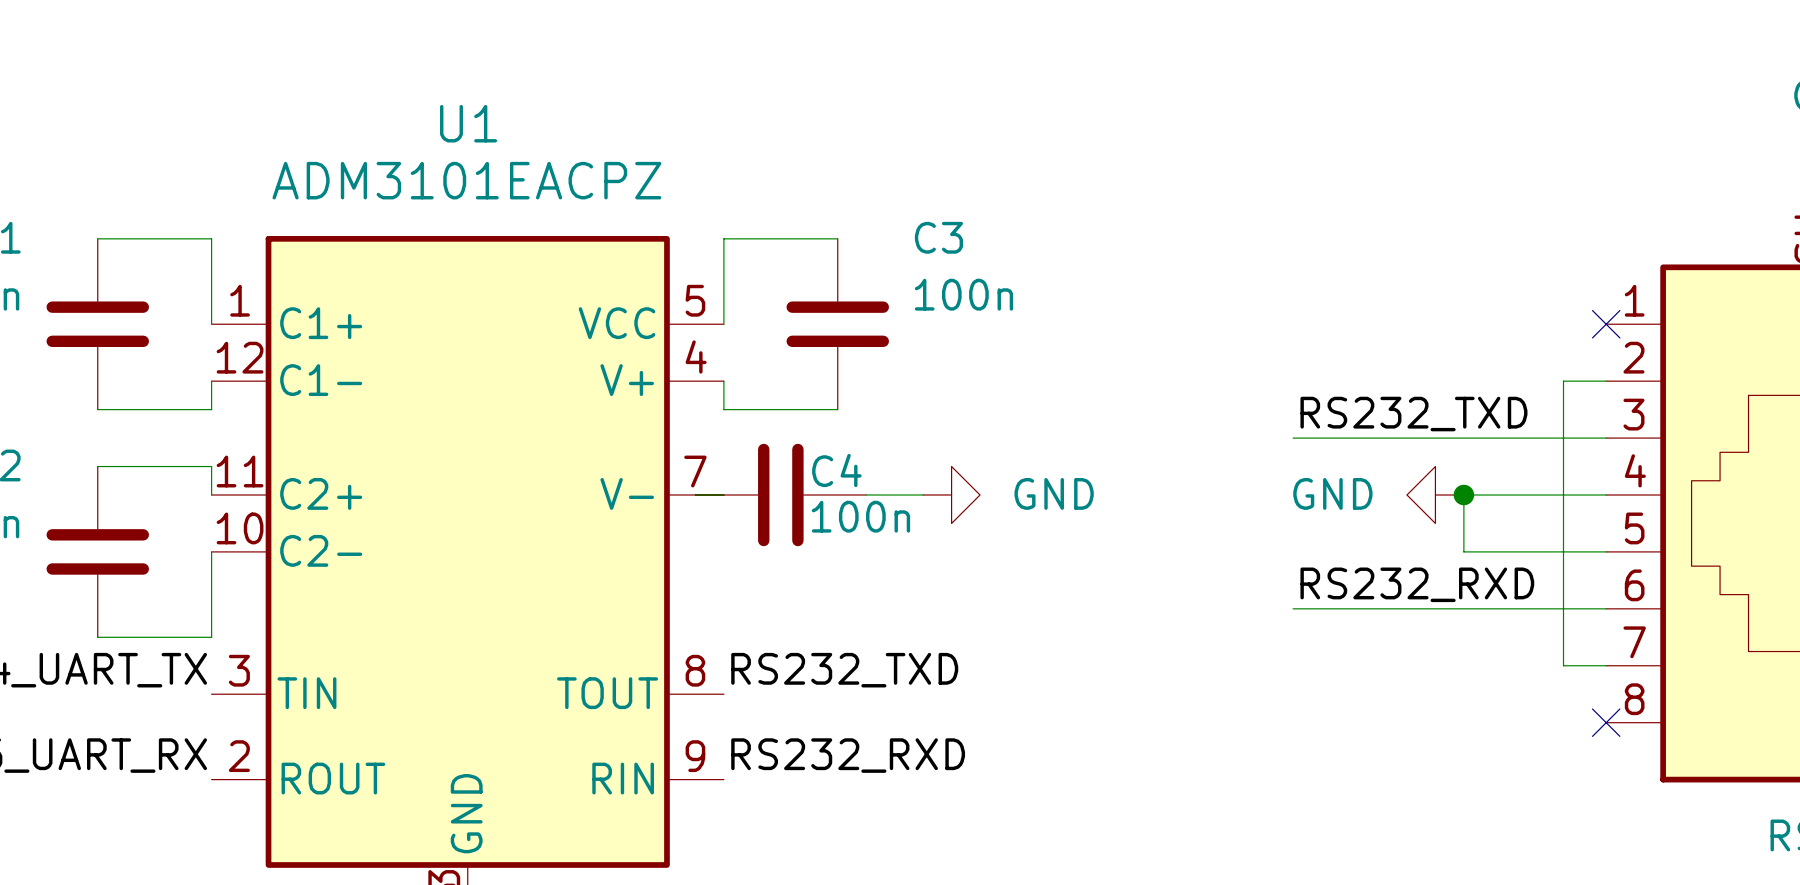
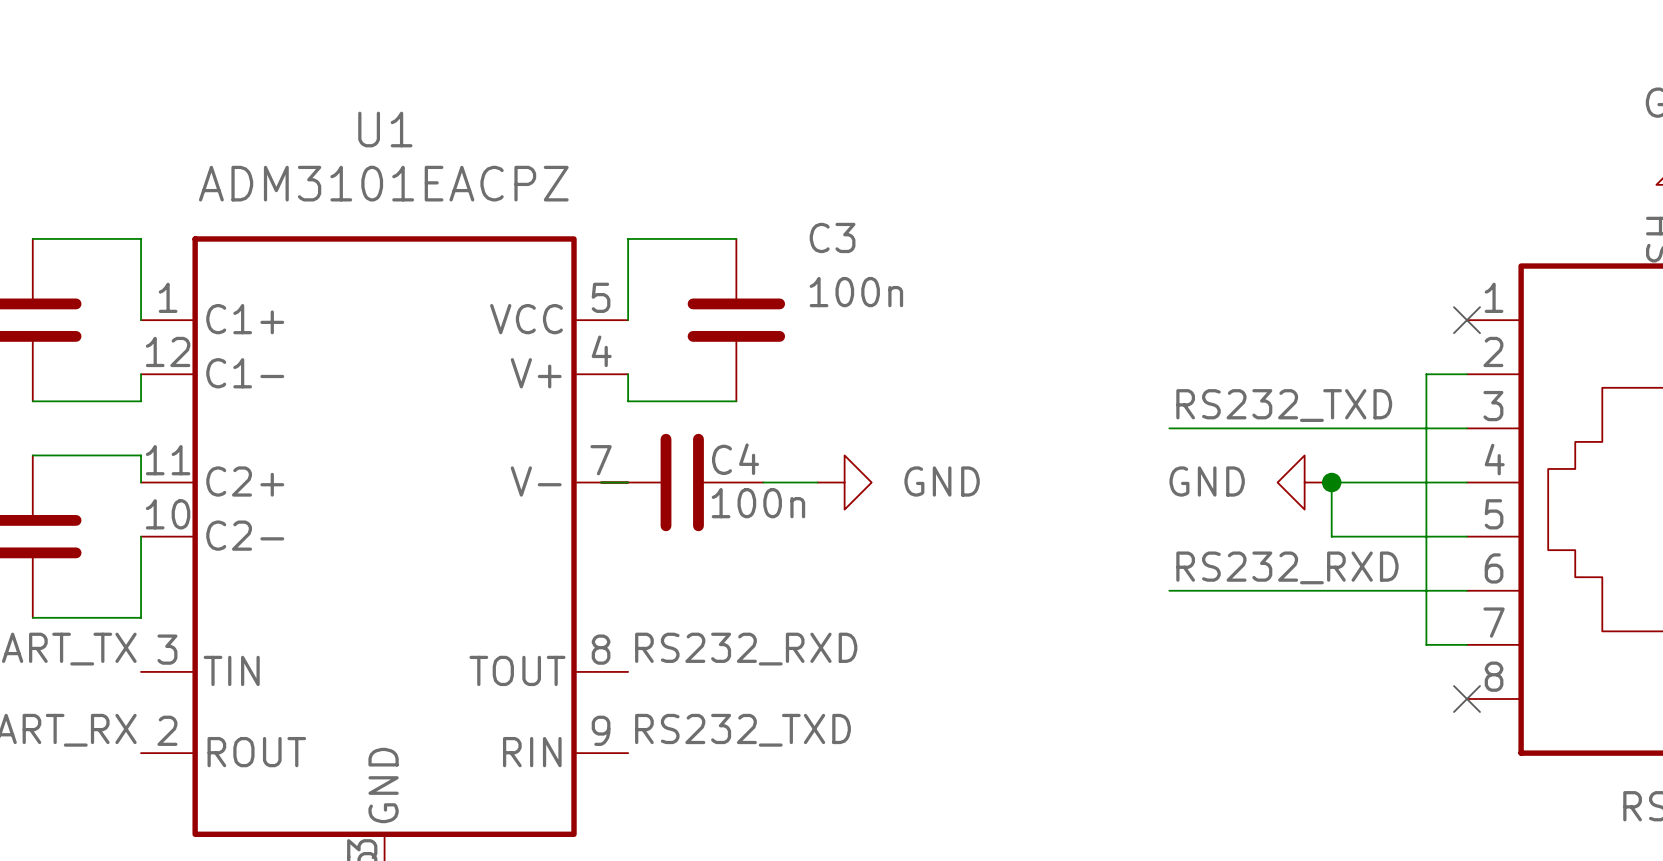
label: RS232_TXD (844, 670) -> RS232_RXD (746, 649)
label: RS232_RXD (848, 755) -> RS232_TXD (743, 730)

